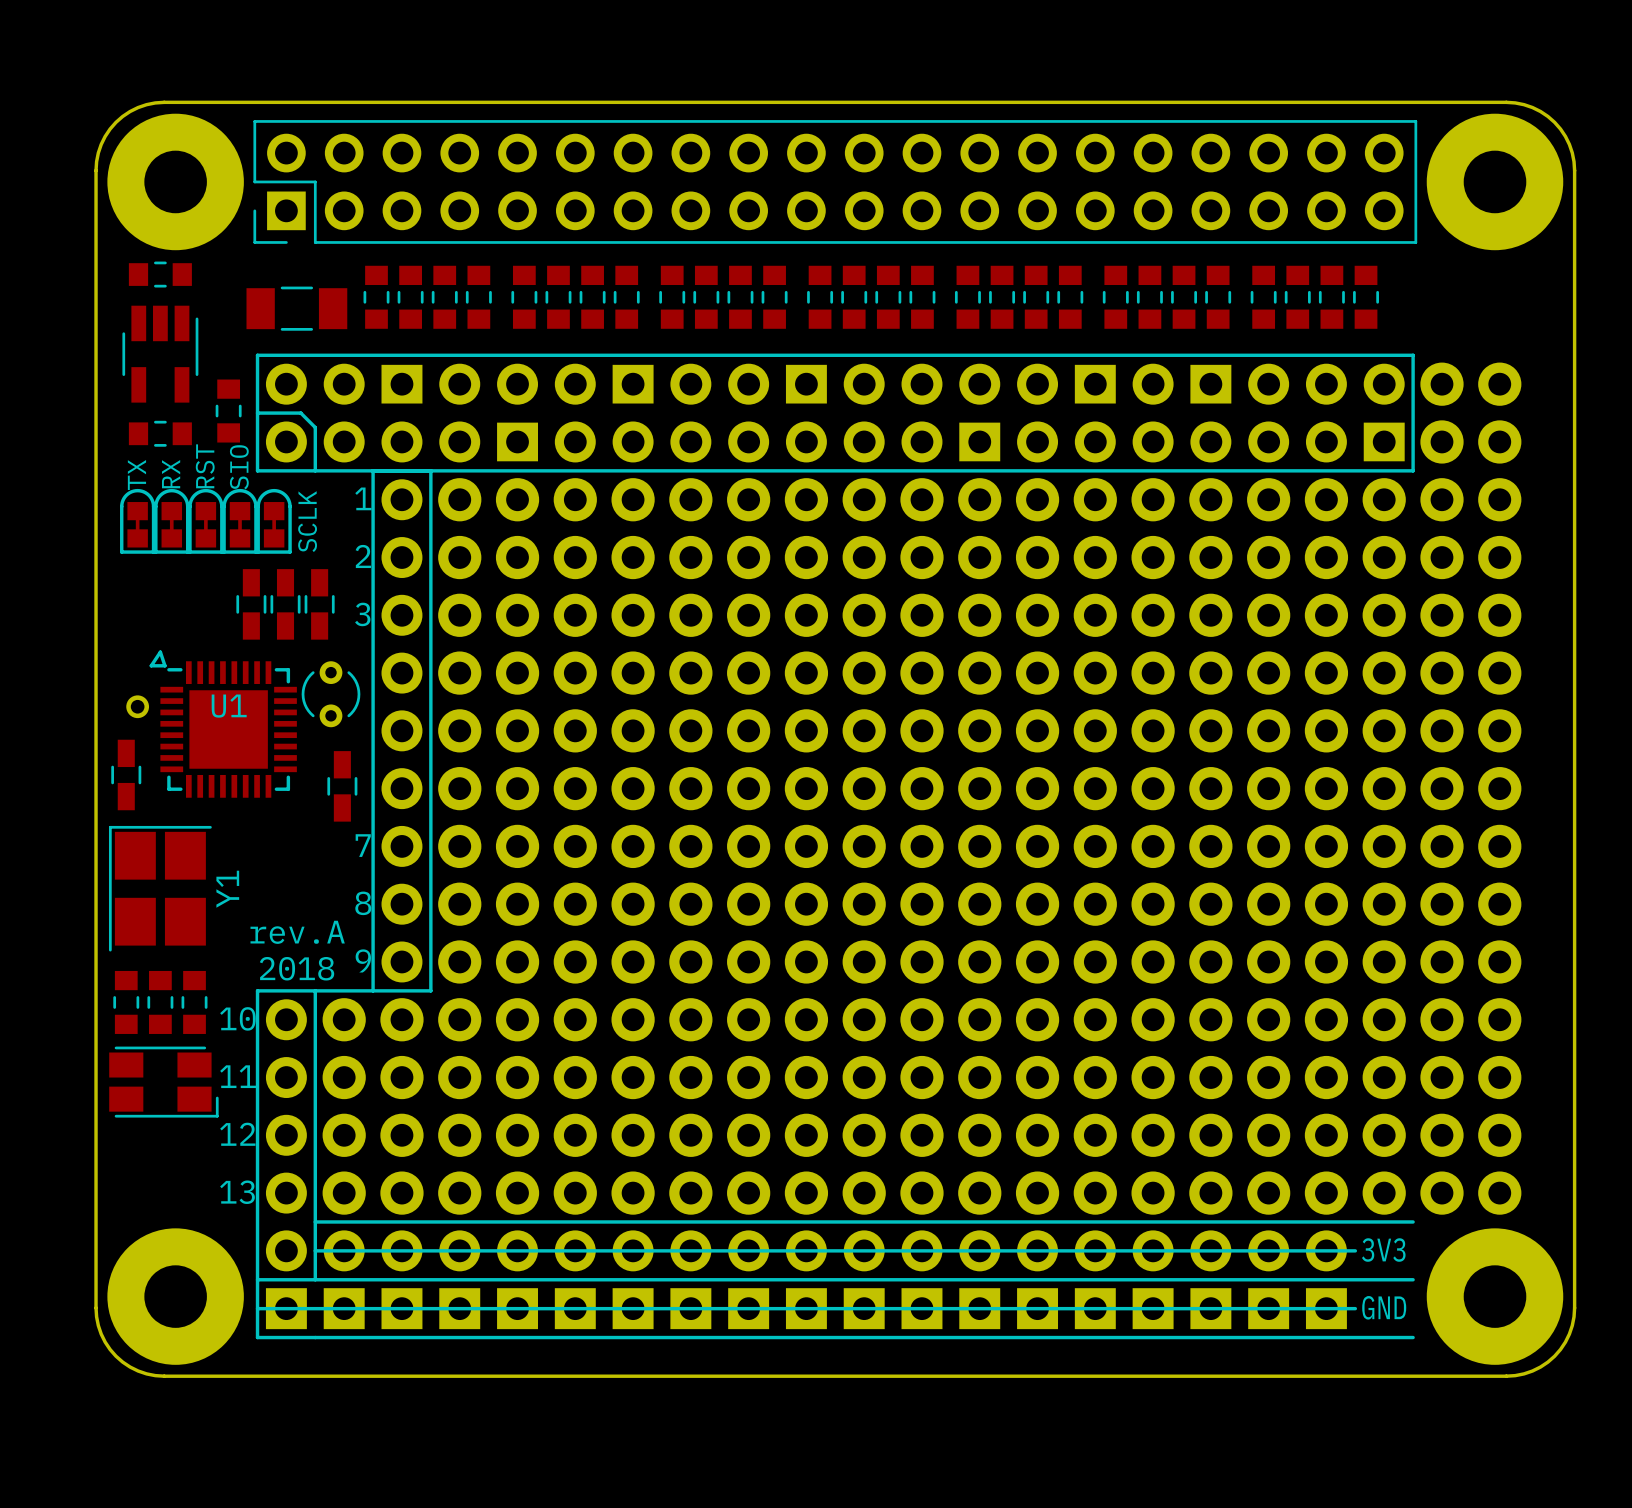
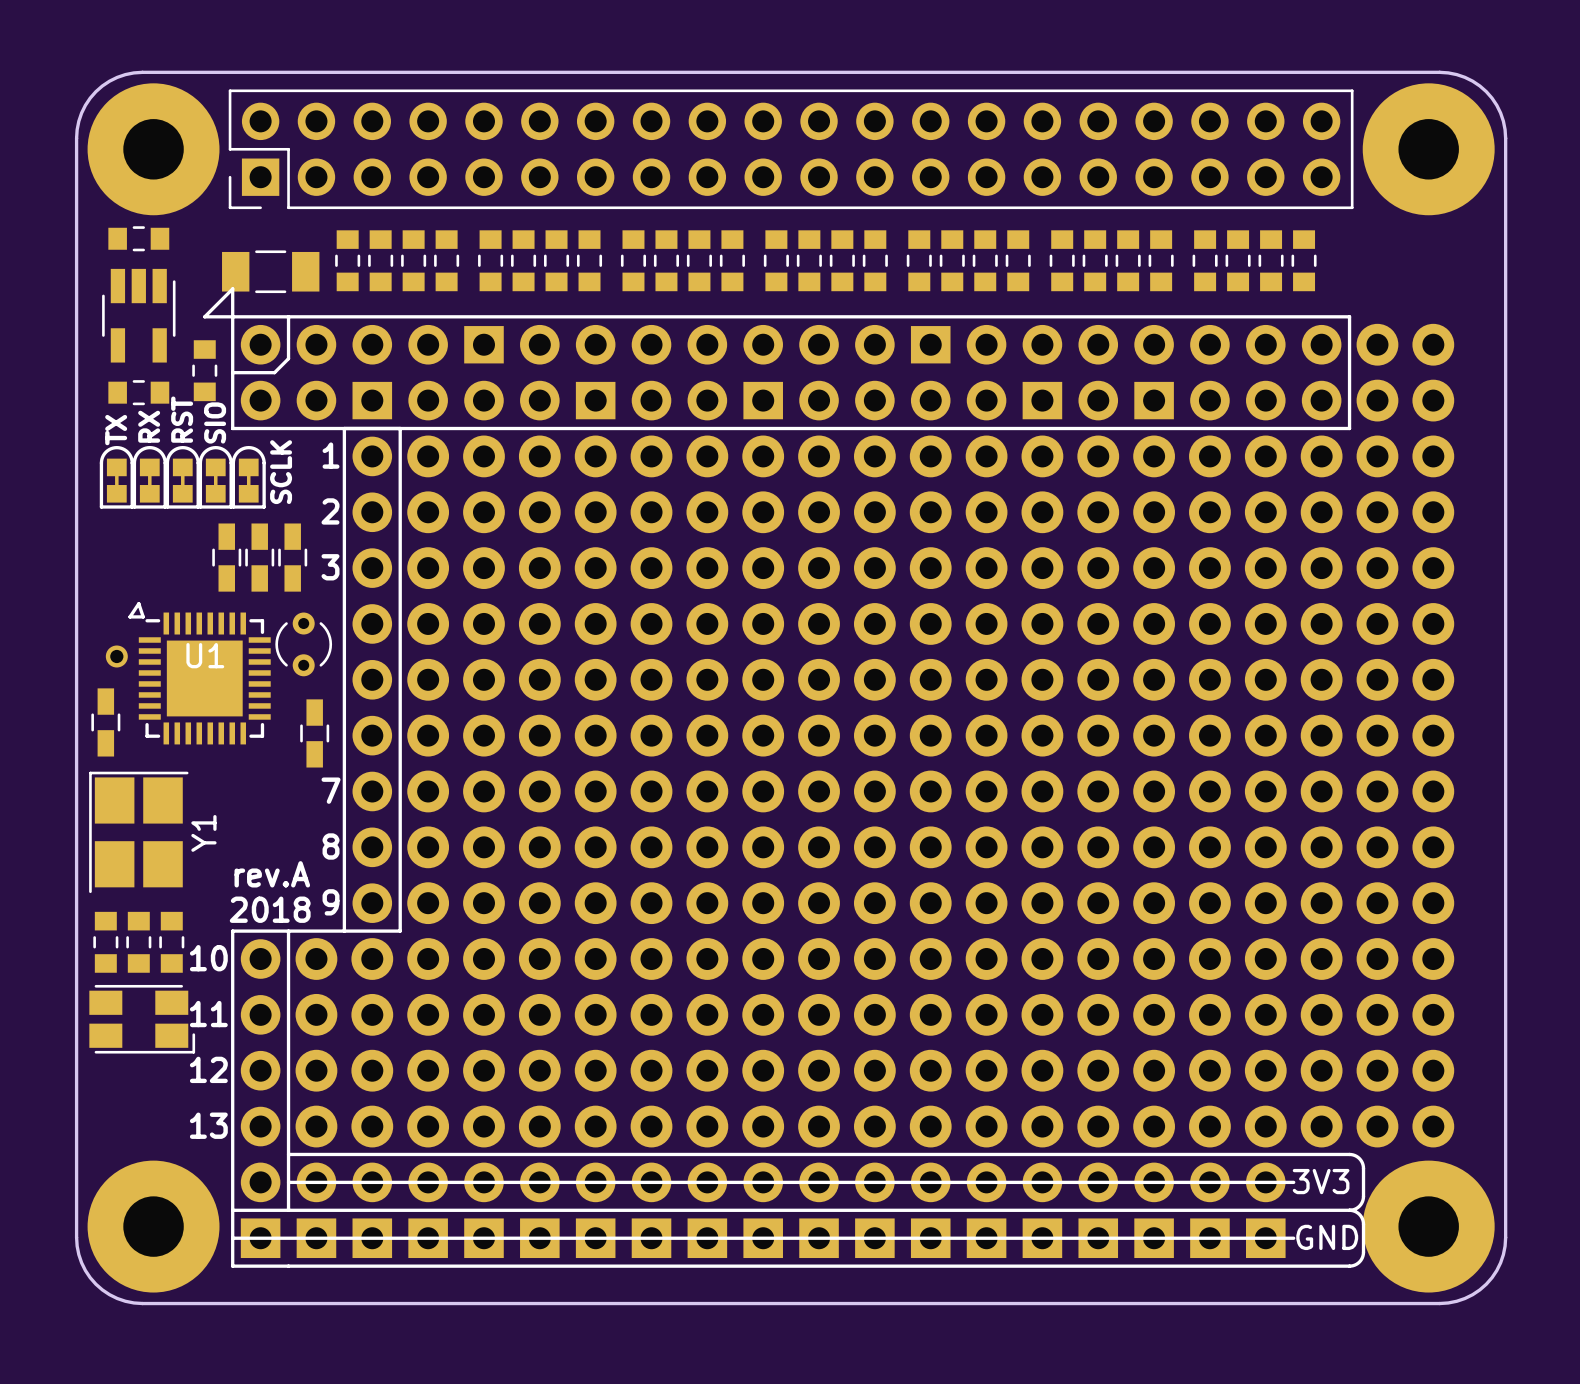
part footprint: [255, 353, 1522, 1340] -> [203, 287, 1455, 1268]

